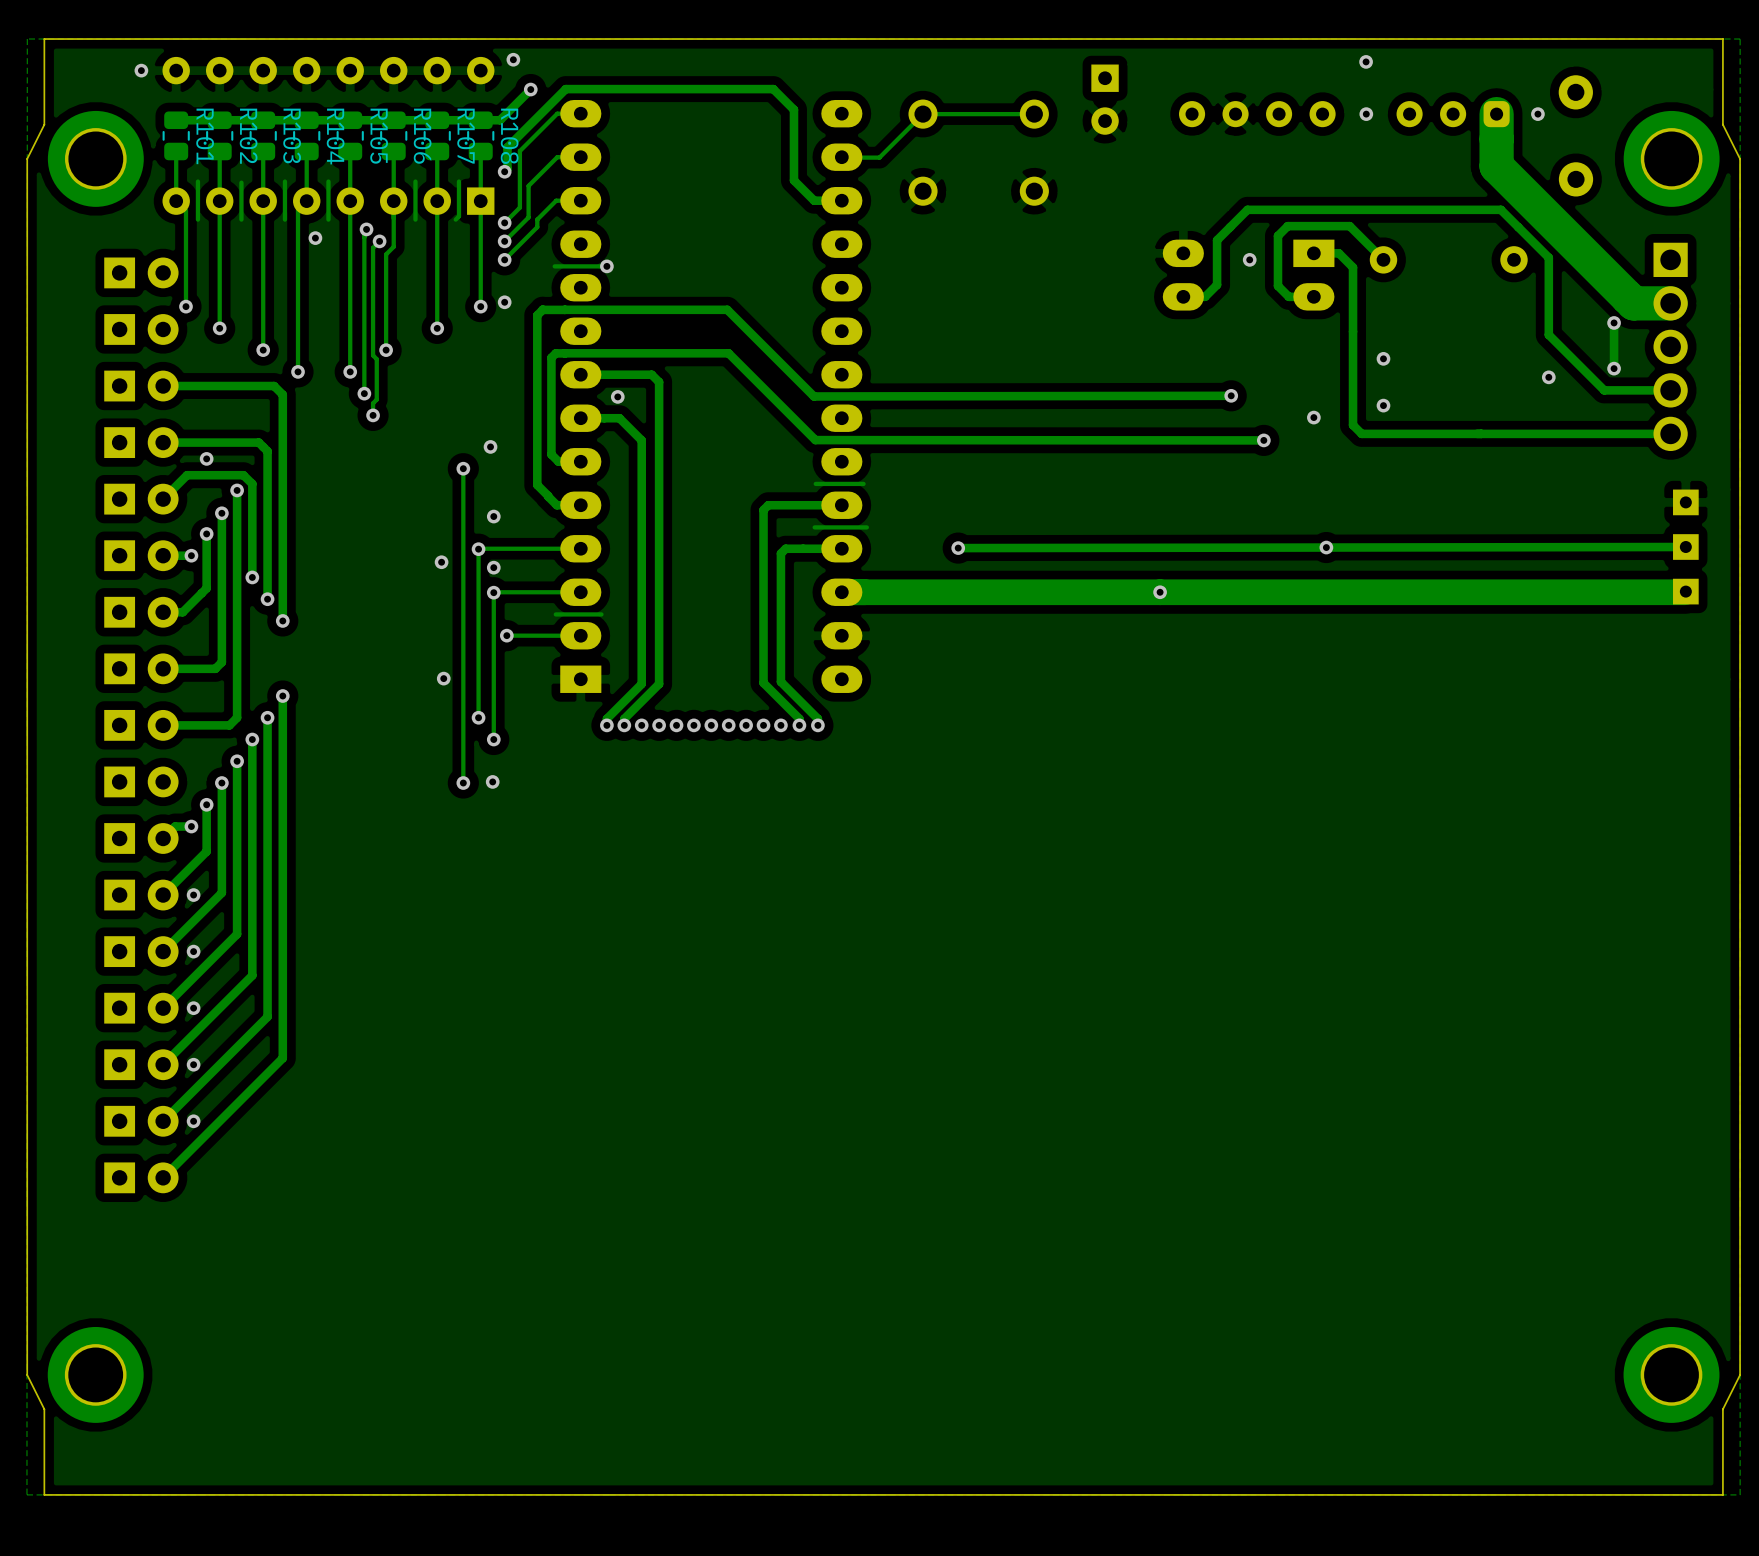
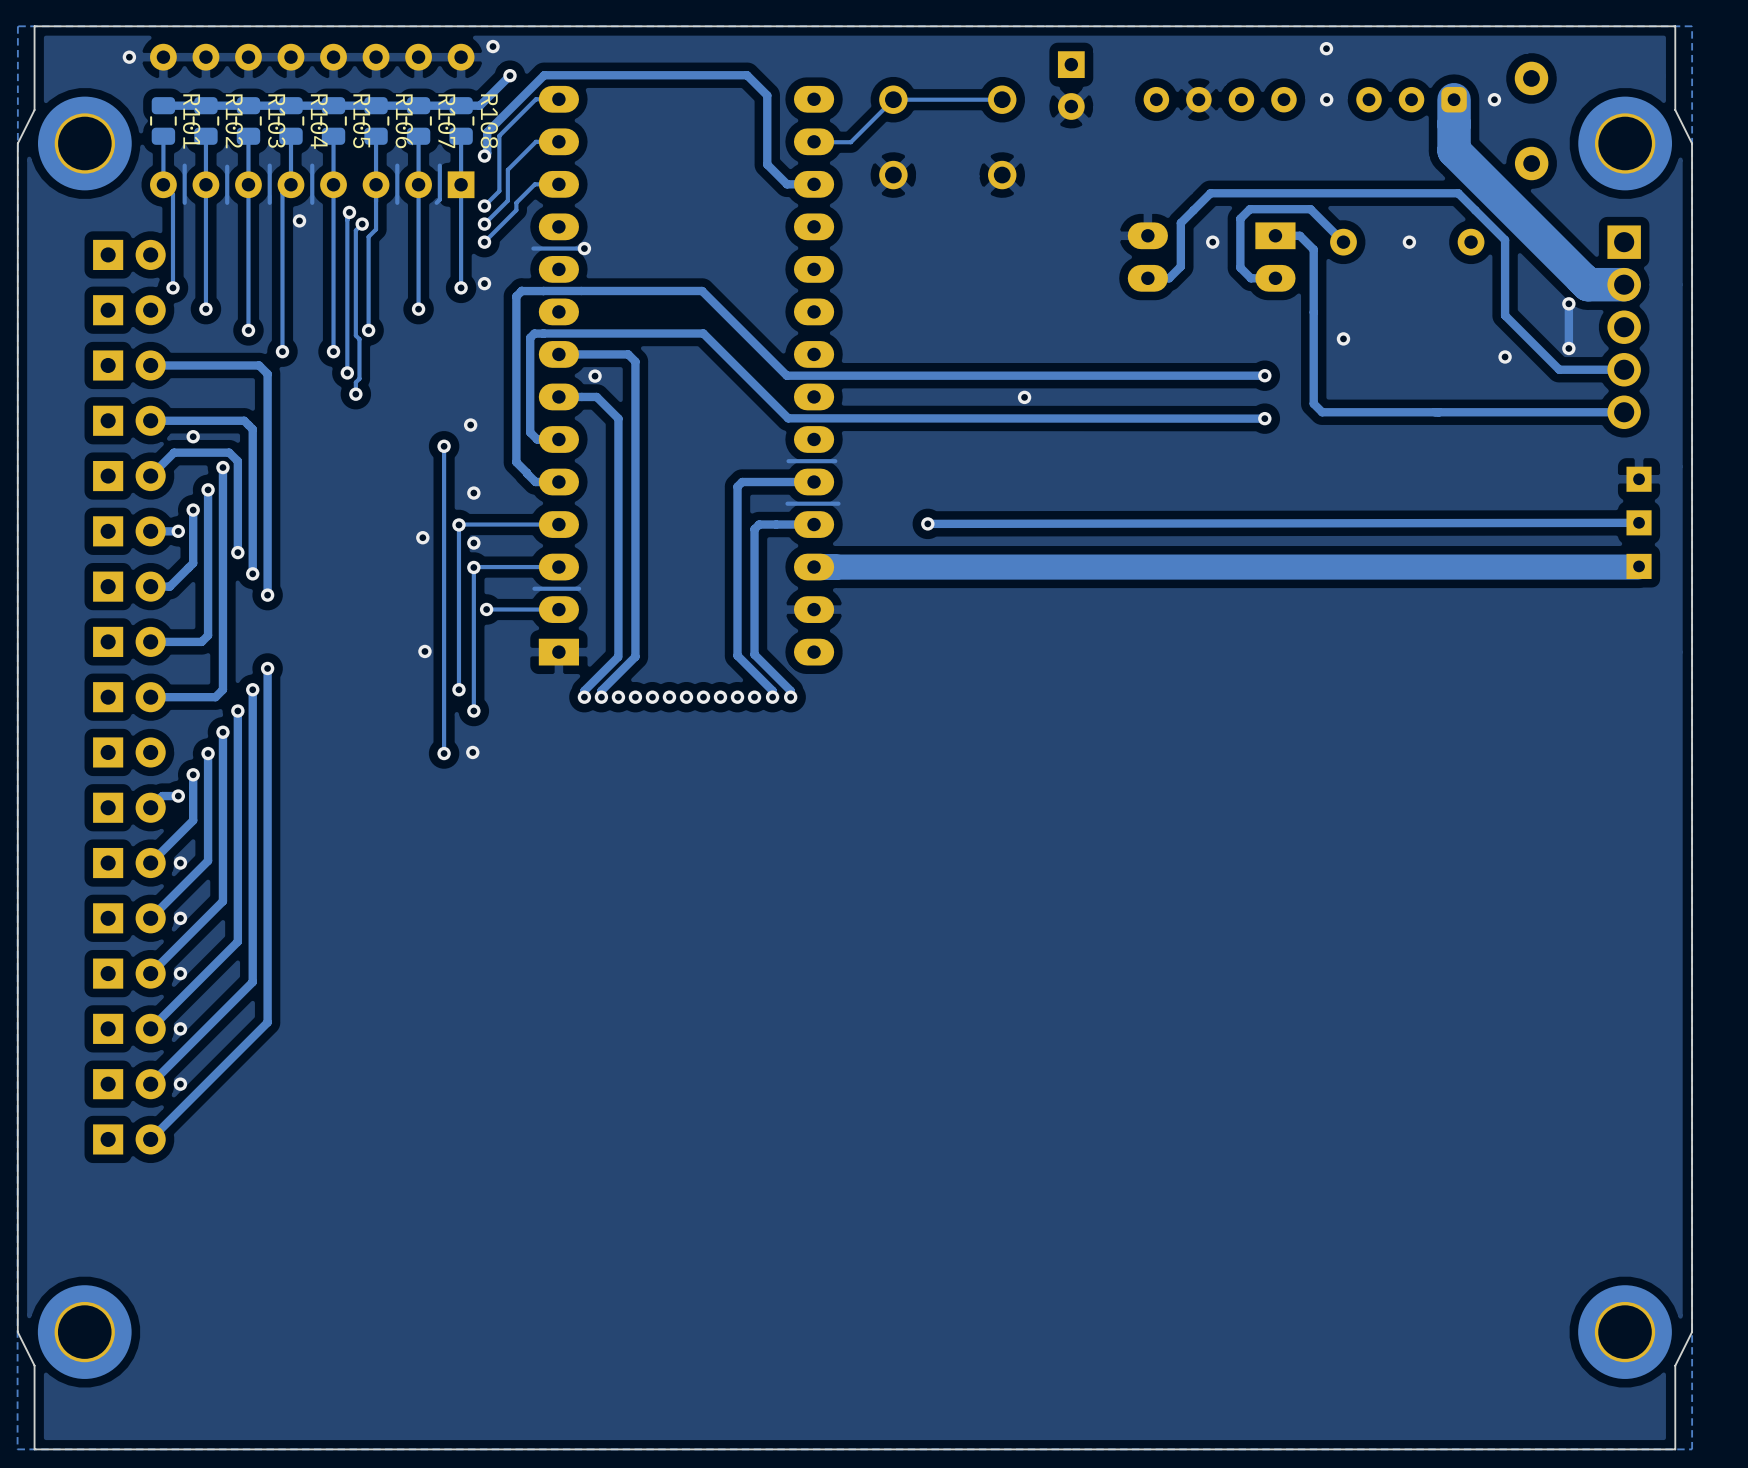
via: none -> (1409, 242)
track: (1231, 395) (813, 396) -> (1264, 375) (786, 375)
via: (1231, 395) -> none
via: none -> (1264, 375)
via: (1383, 405) -> none
via: (1313, 417) -> none
via: none -> (1024, 397)
track: (815, 440) (1263, 440) -> (788, 418) (1264, 418)
via: (1263, 440) -> none
via: none -> (1264, 418)
via: (1326, 547) -> none
via: (1160, 592) -> none

